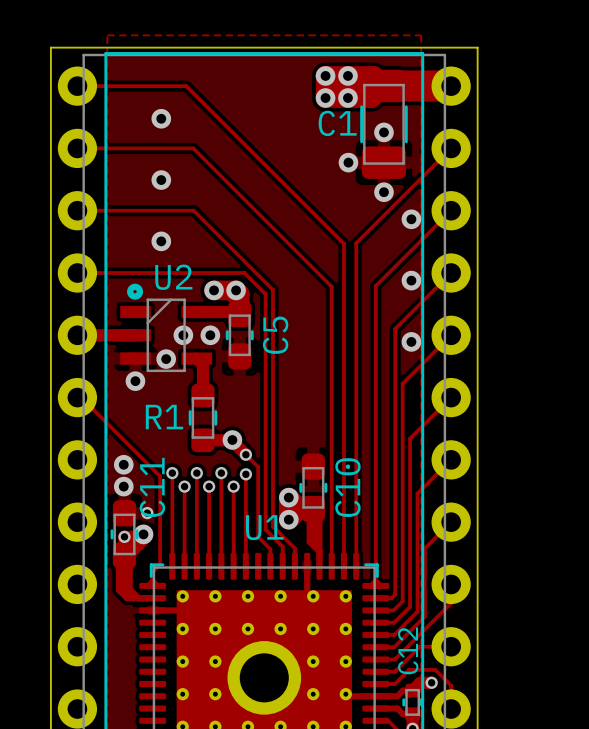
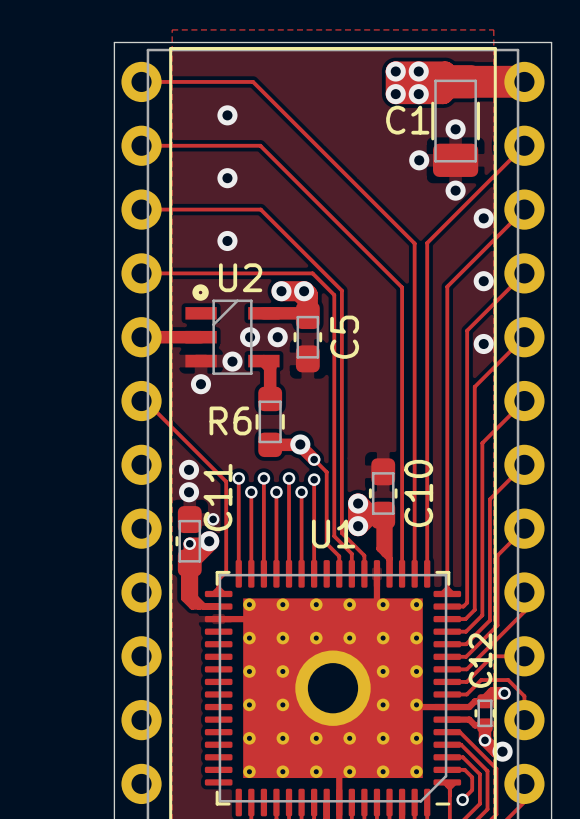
R1 name: R1 (164, 417) -> R6 (230, 420)
C11 footprint: [110, 500, 139, 569] -> [175, 506, 202, 577]

